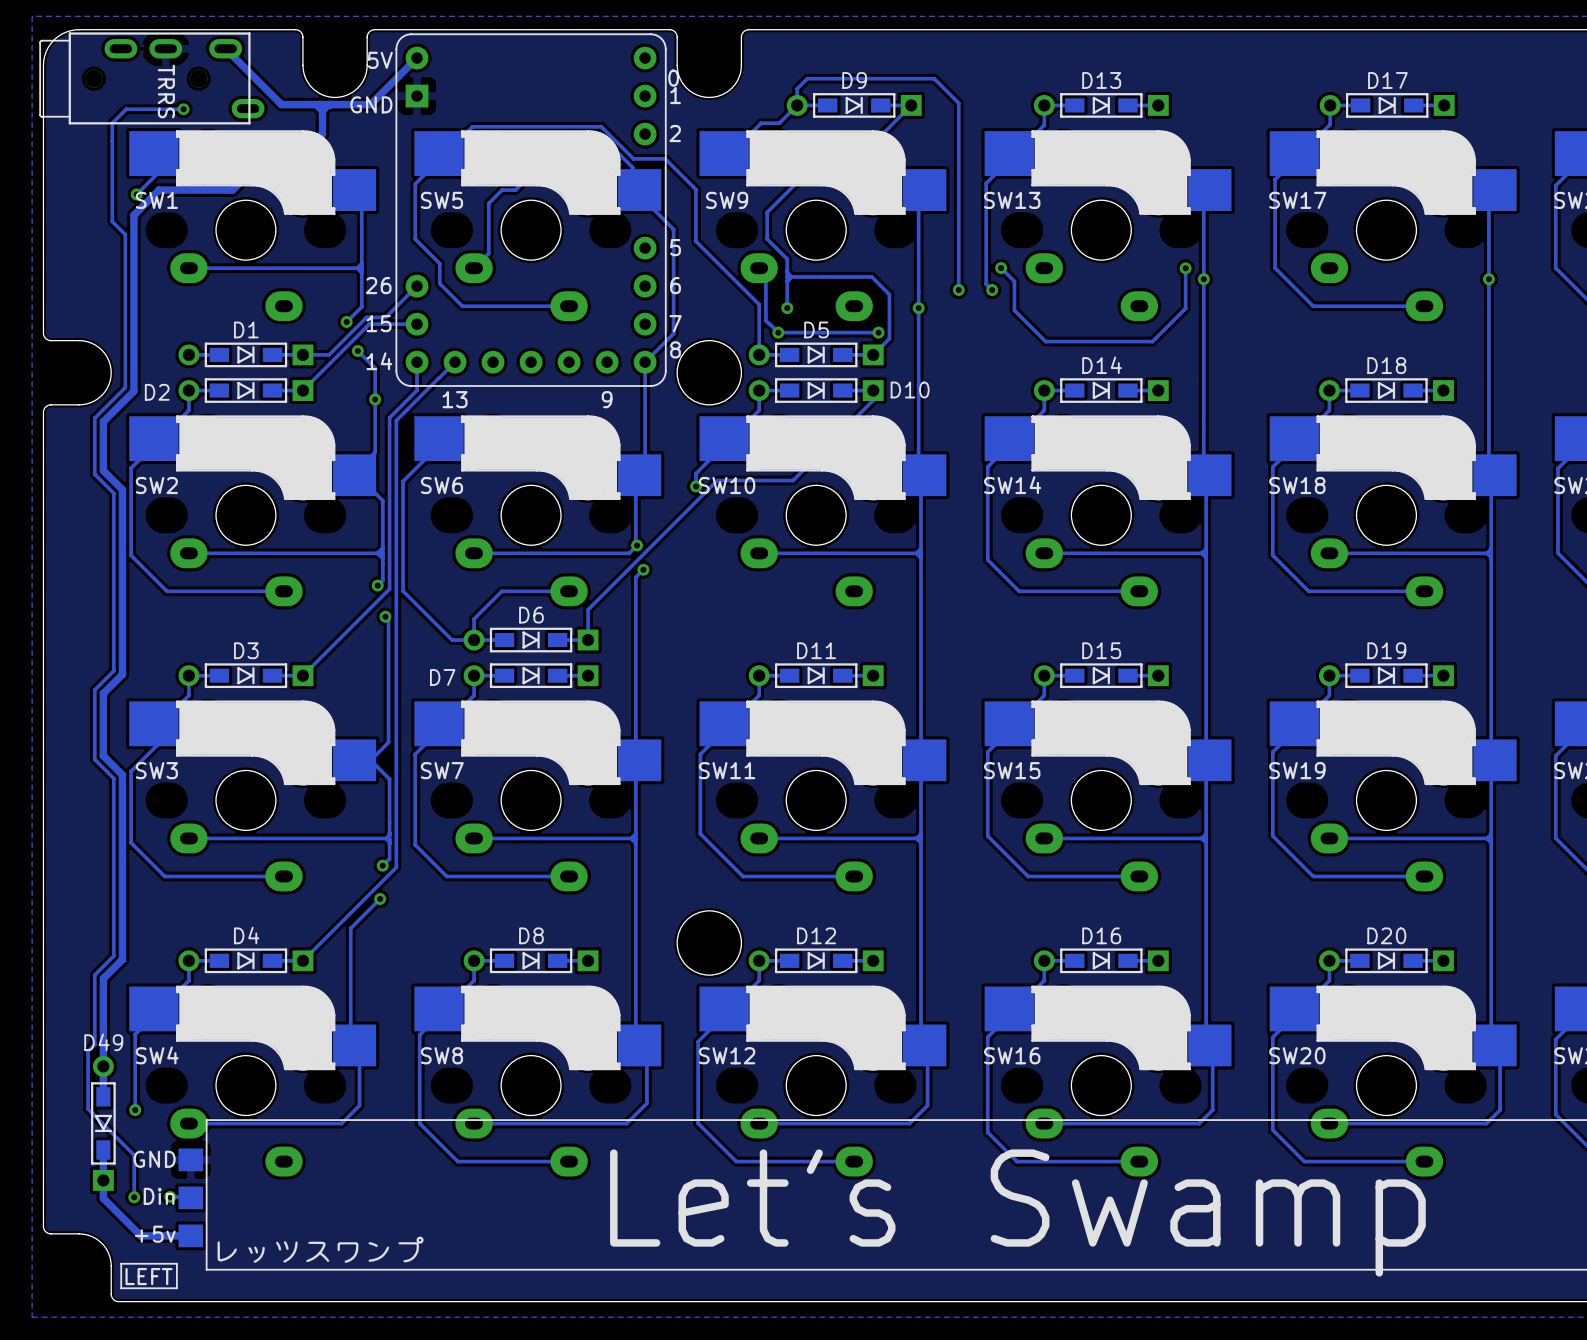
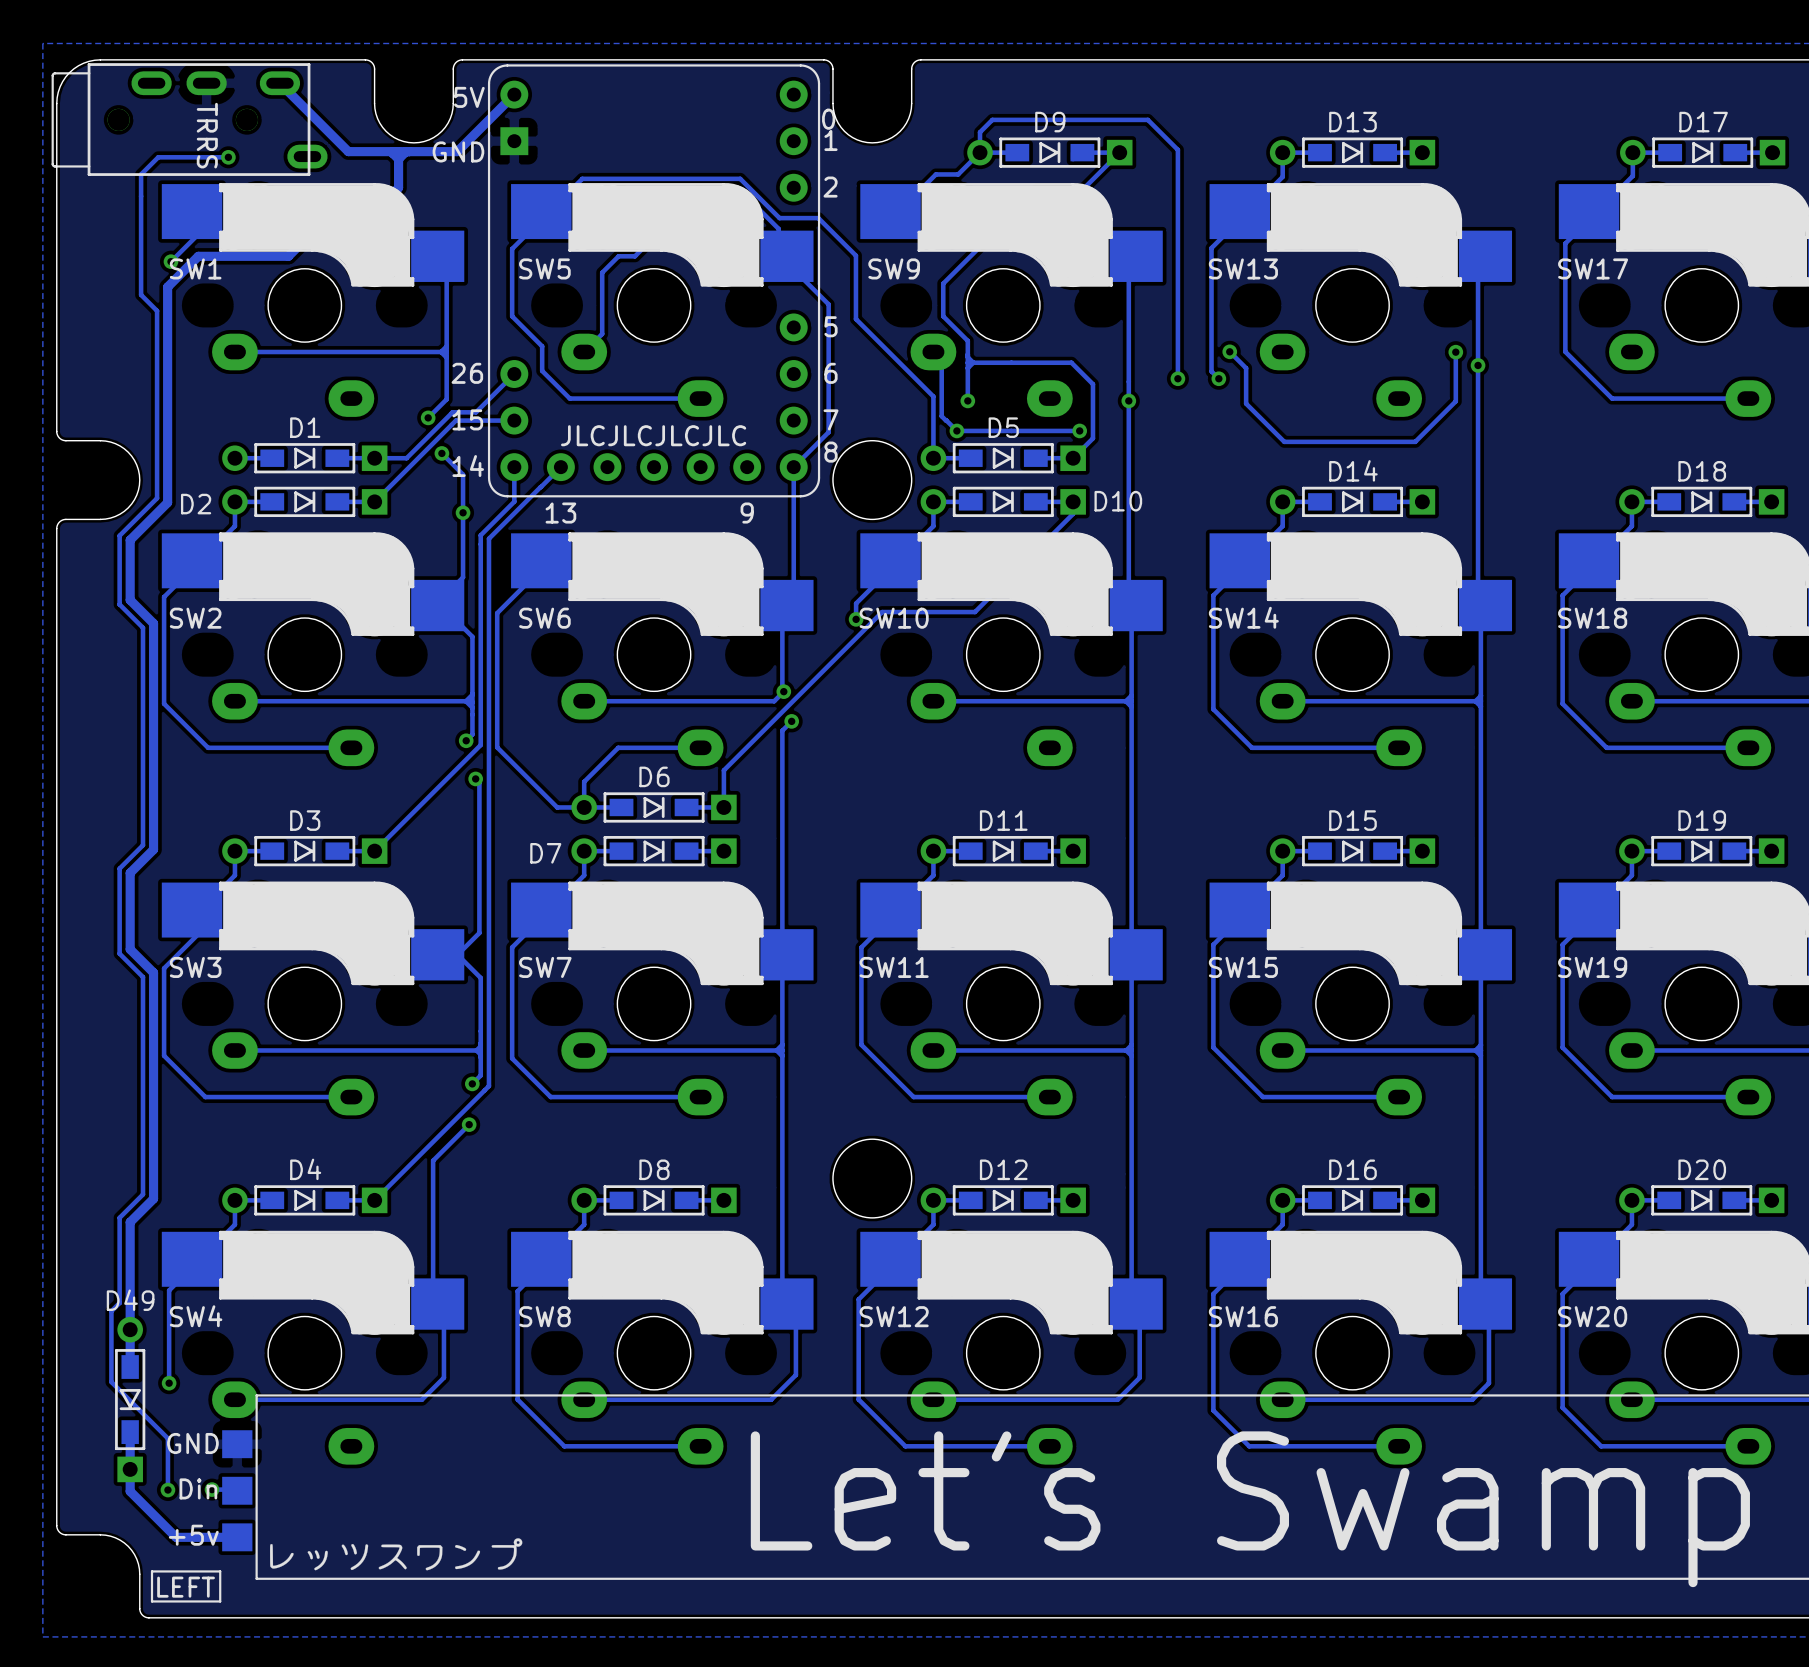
text: none -> JLCJLCJLCJLC (653, 435)

